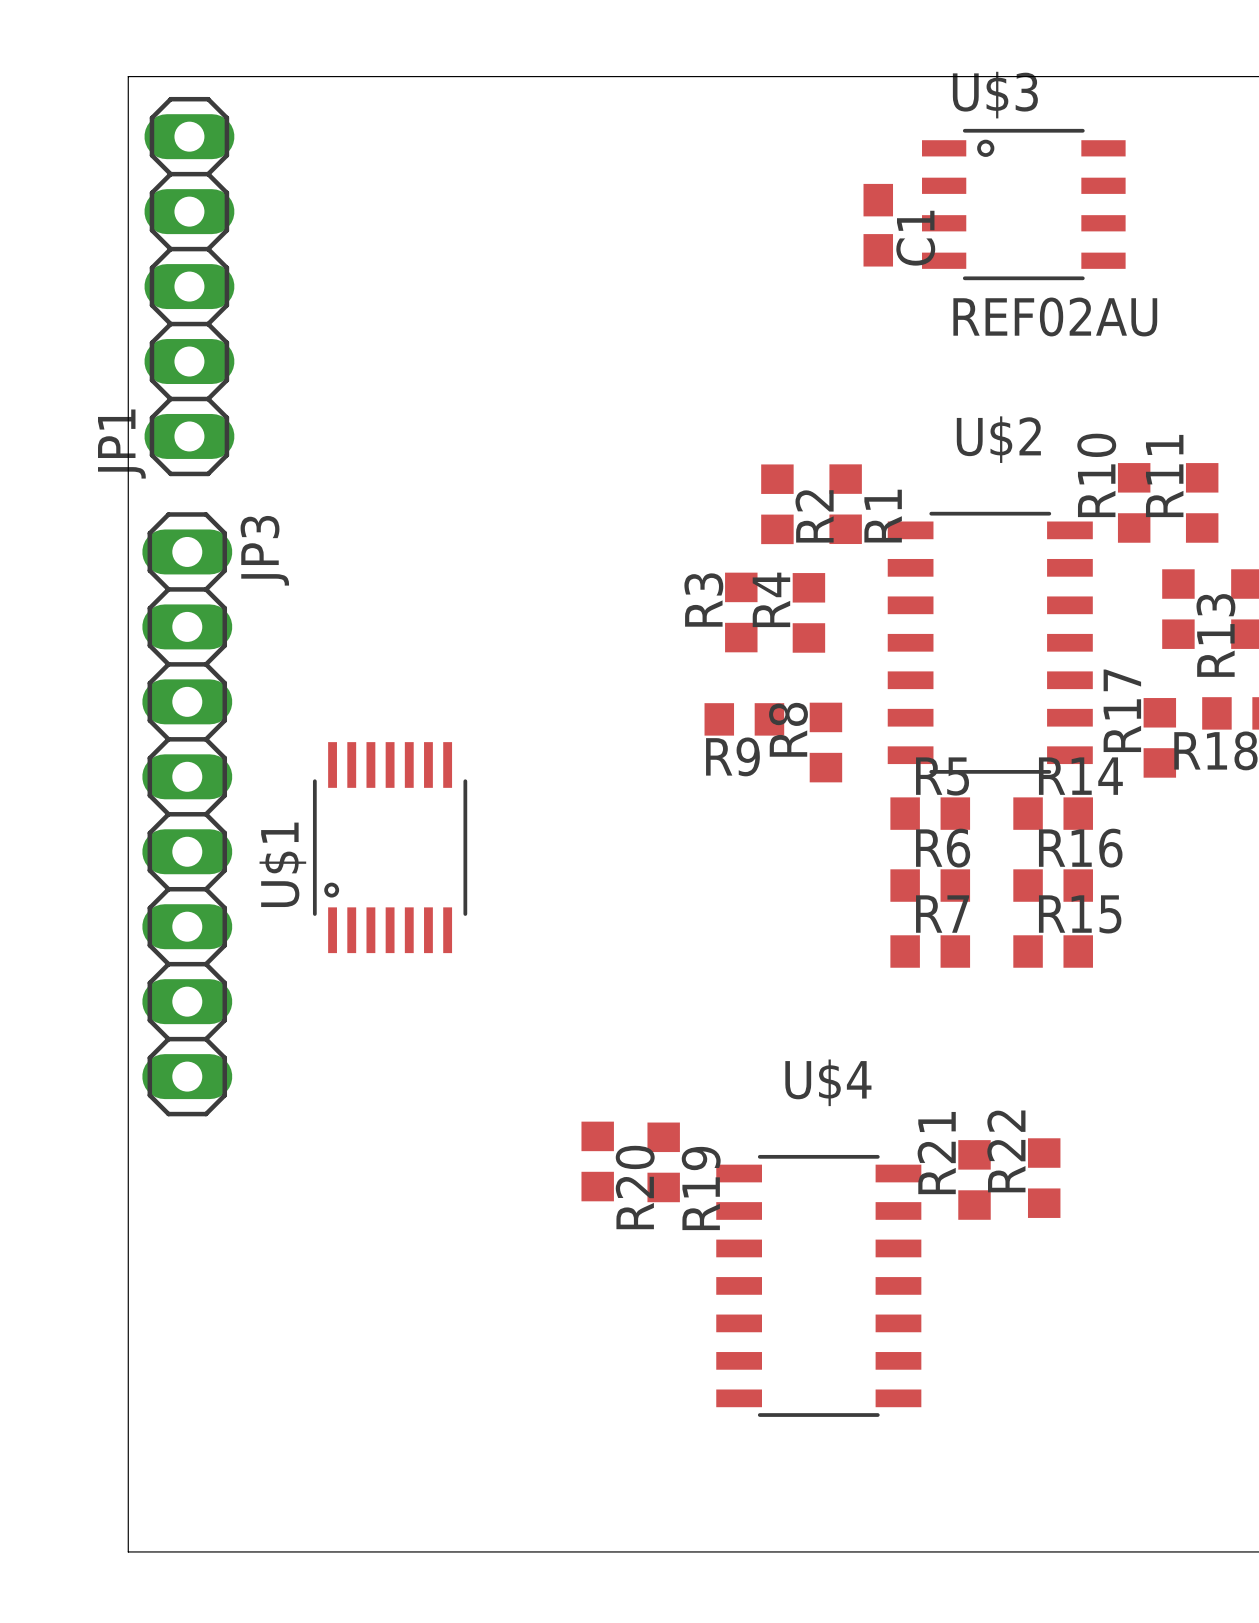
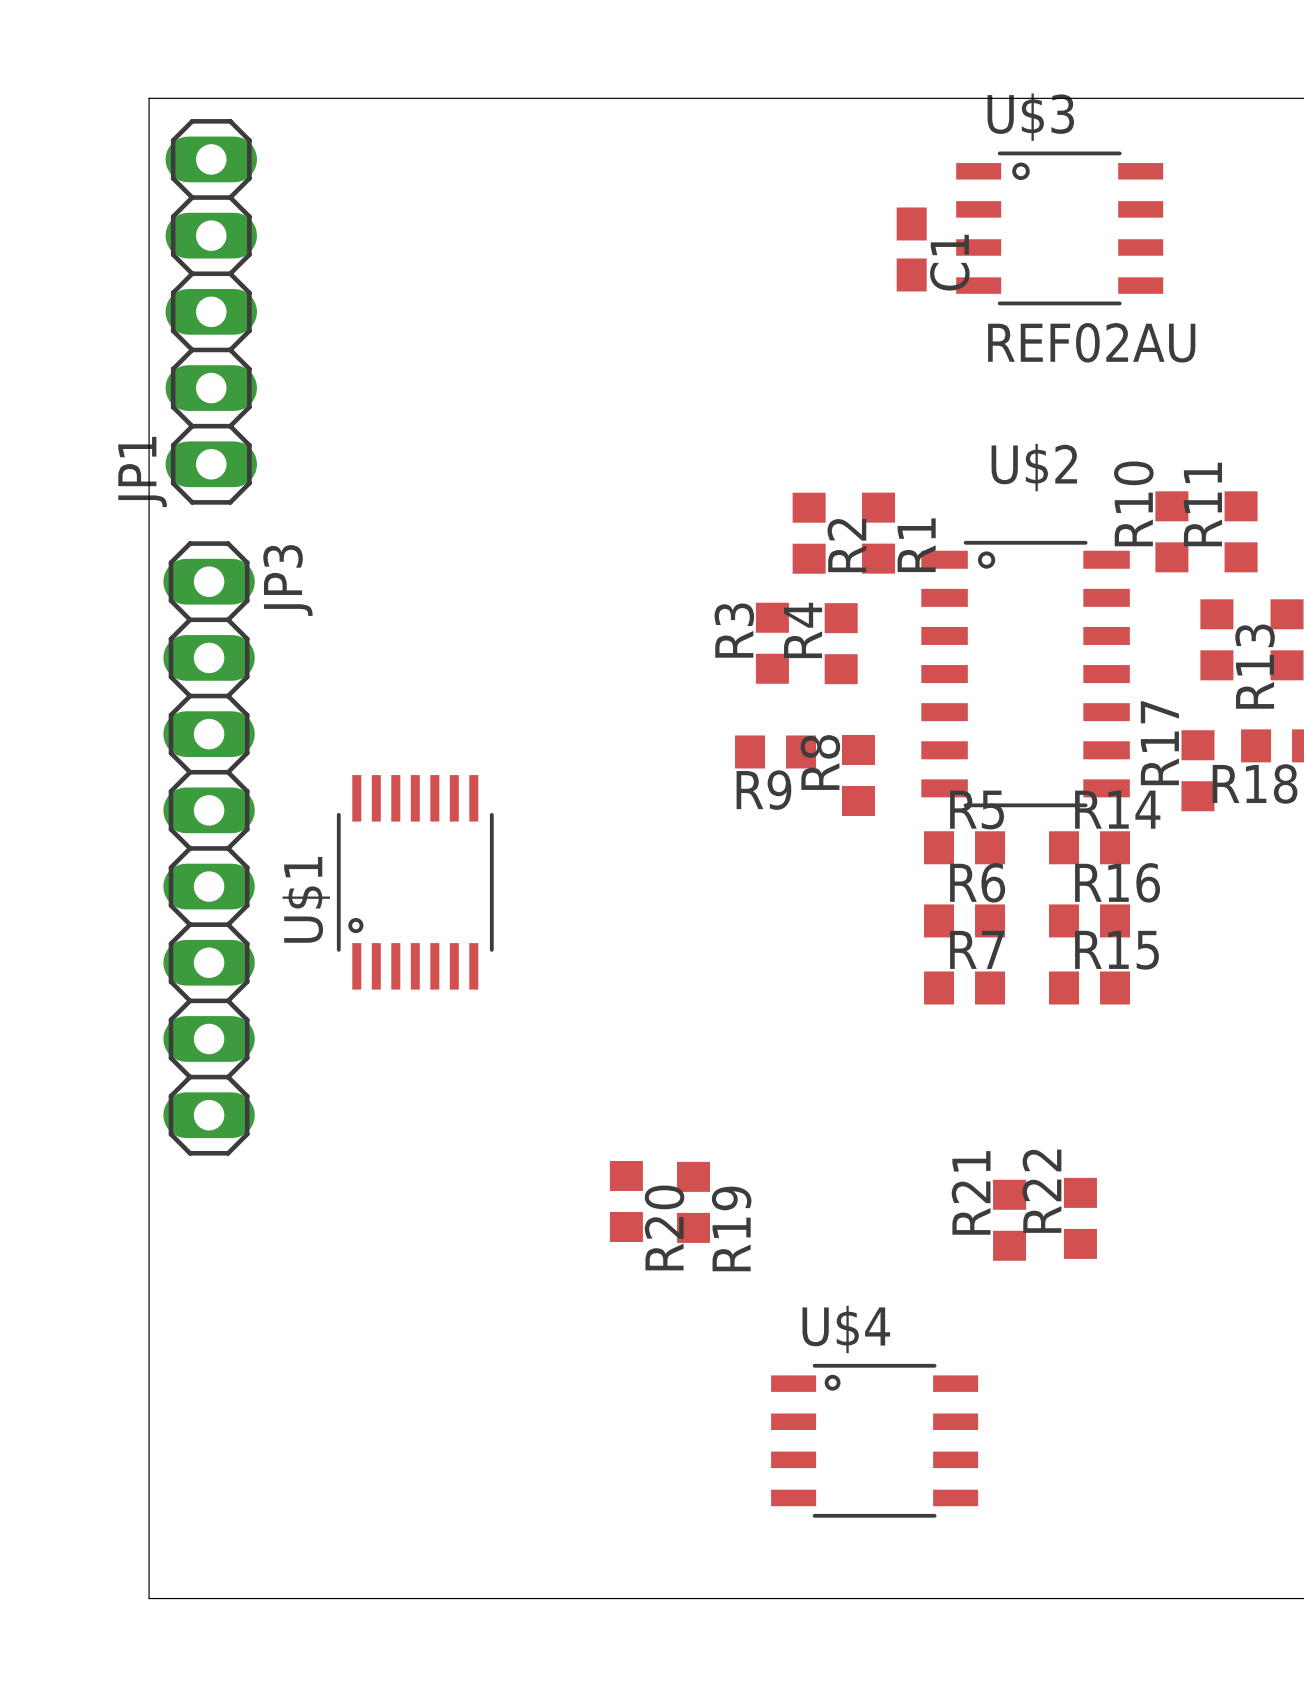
U$2 footprint: [887, 511, 1093, 774] -> [921, 540, 1130, 808]
U$4 name position: U$4 (828, 1082) -> U$4 (846, 1329)
U$4 footprint: [716, 1154, 922, 1417] -> [771, 1363, 979, 1518]

